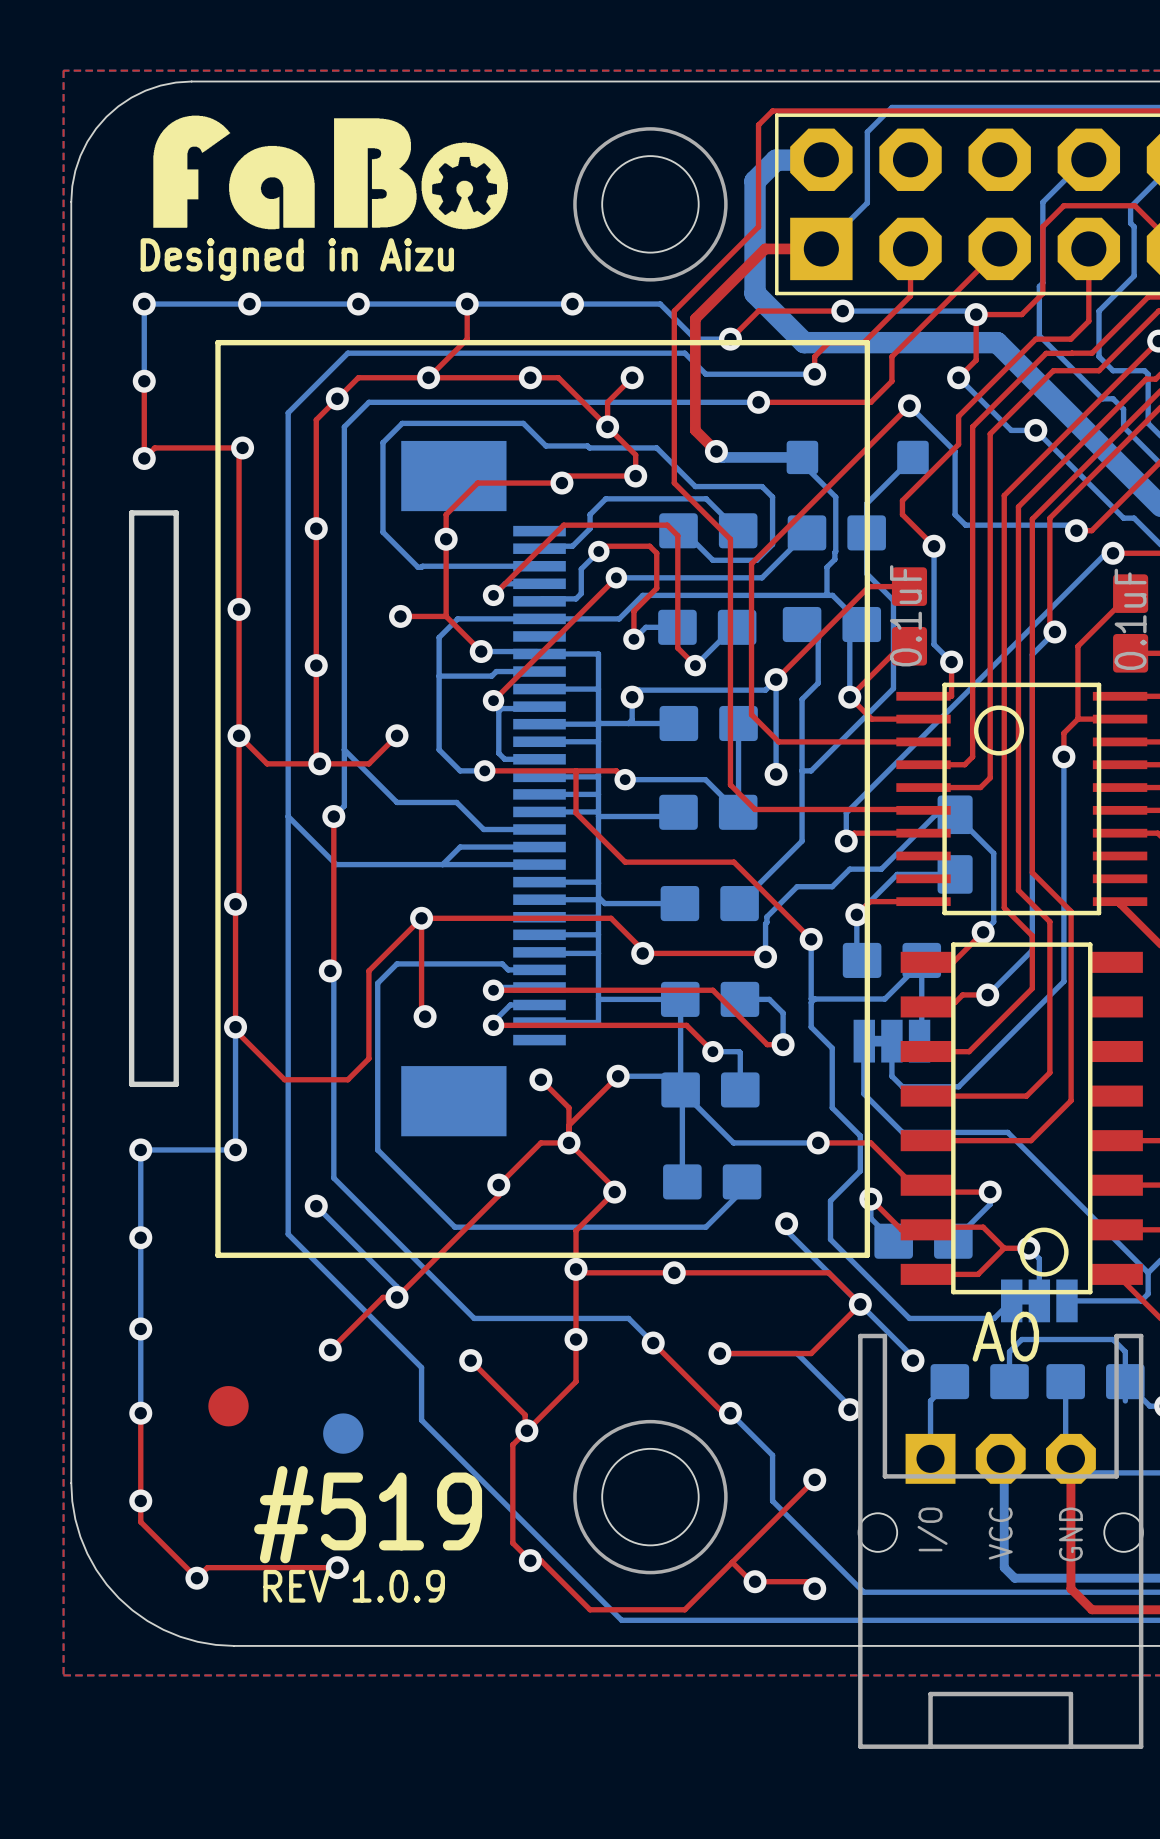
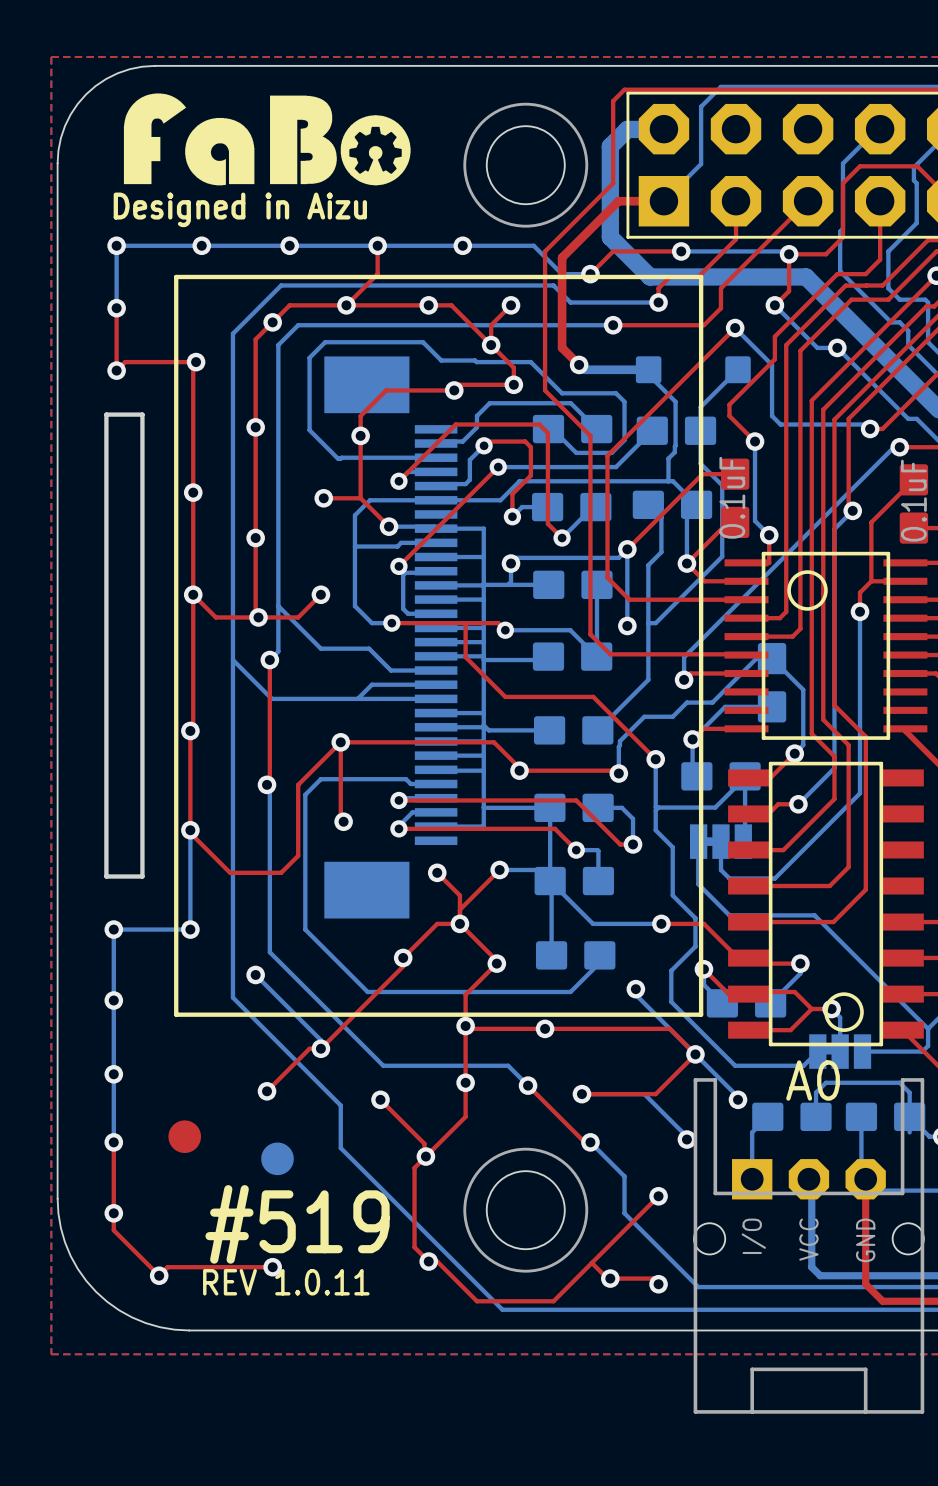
text: REV 1.0.9 (354, 1586) -> REV 1.0.11 (286, 1282)

